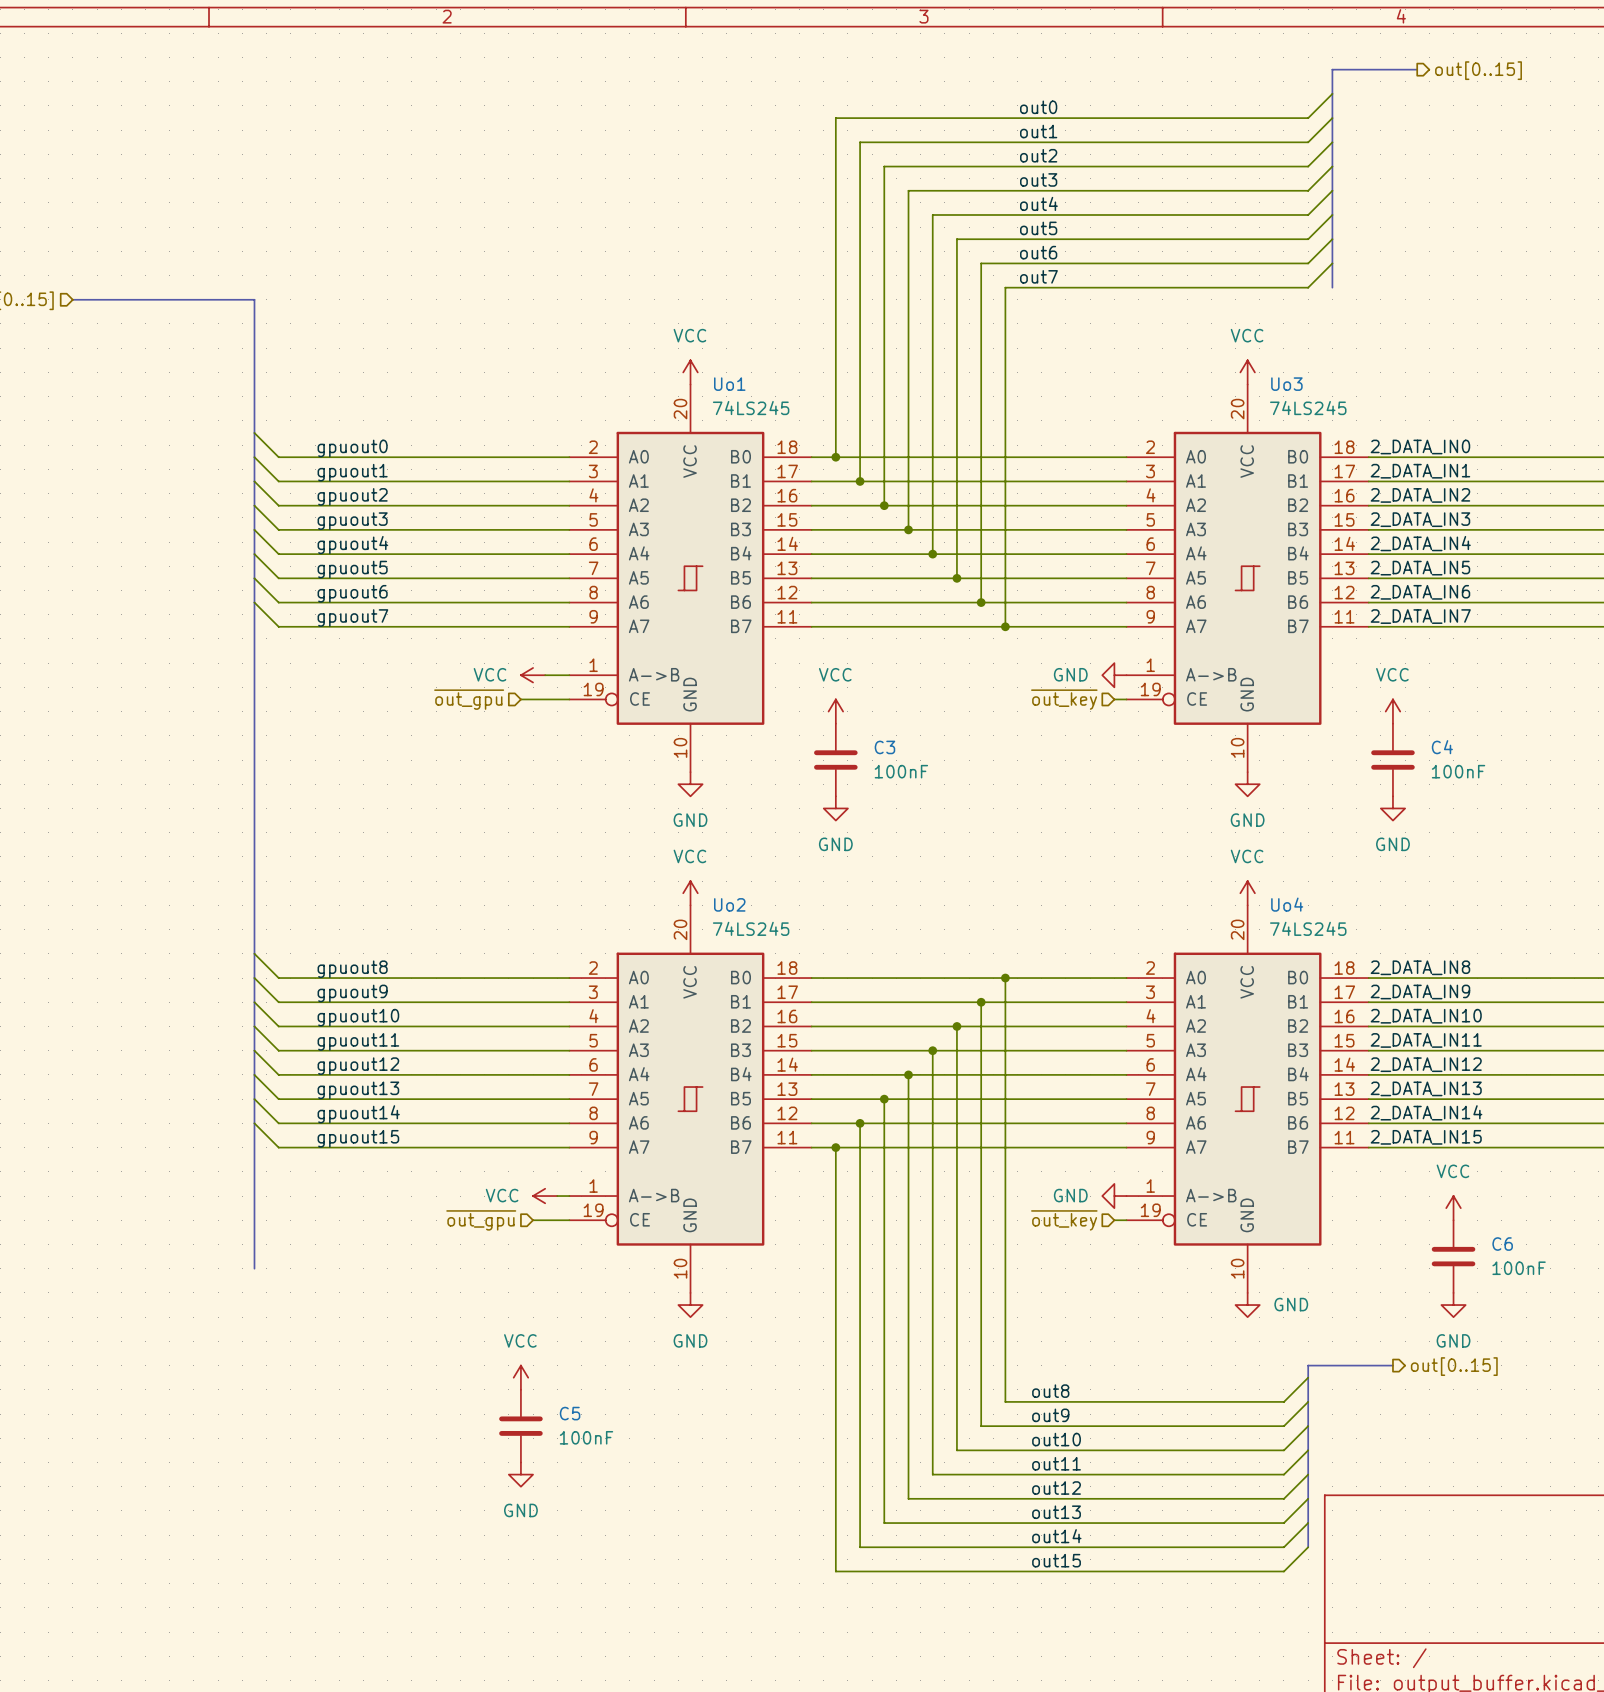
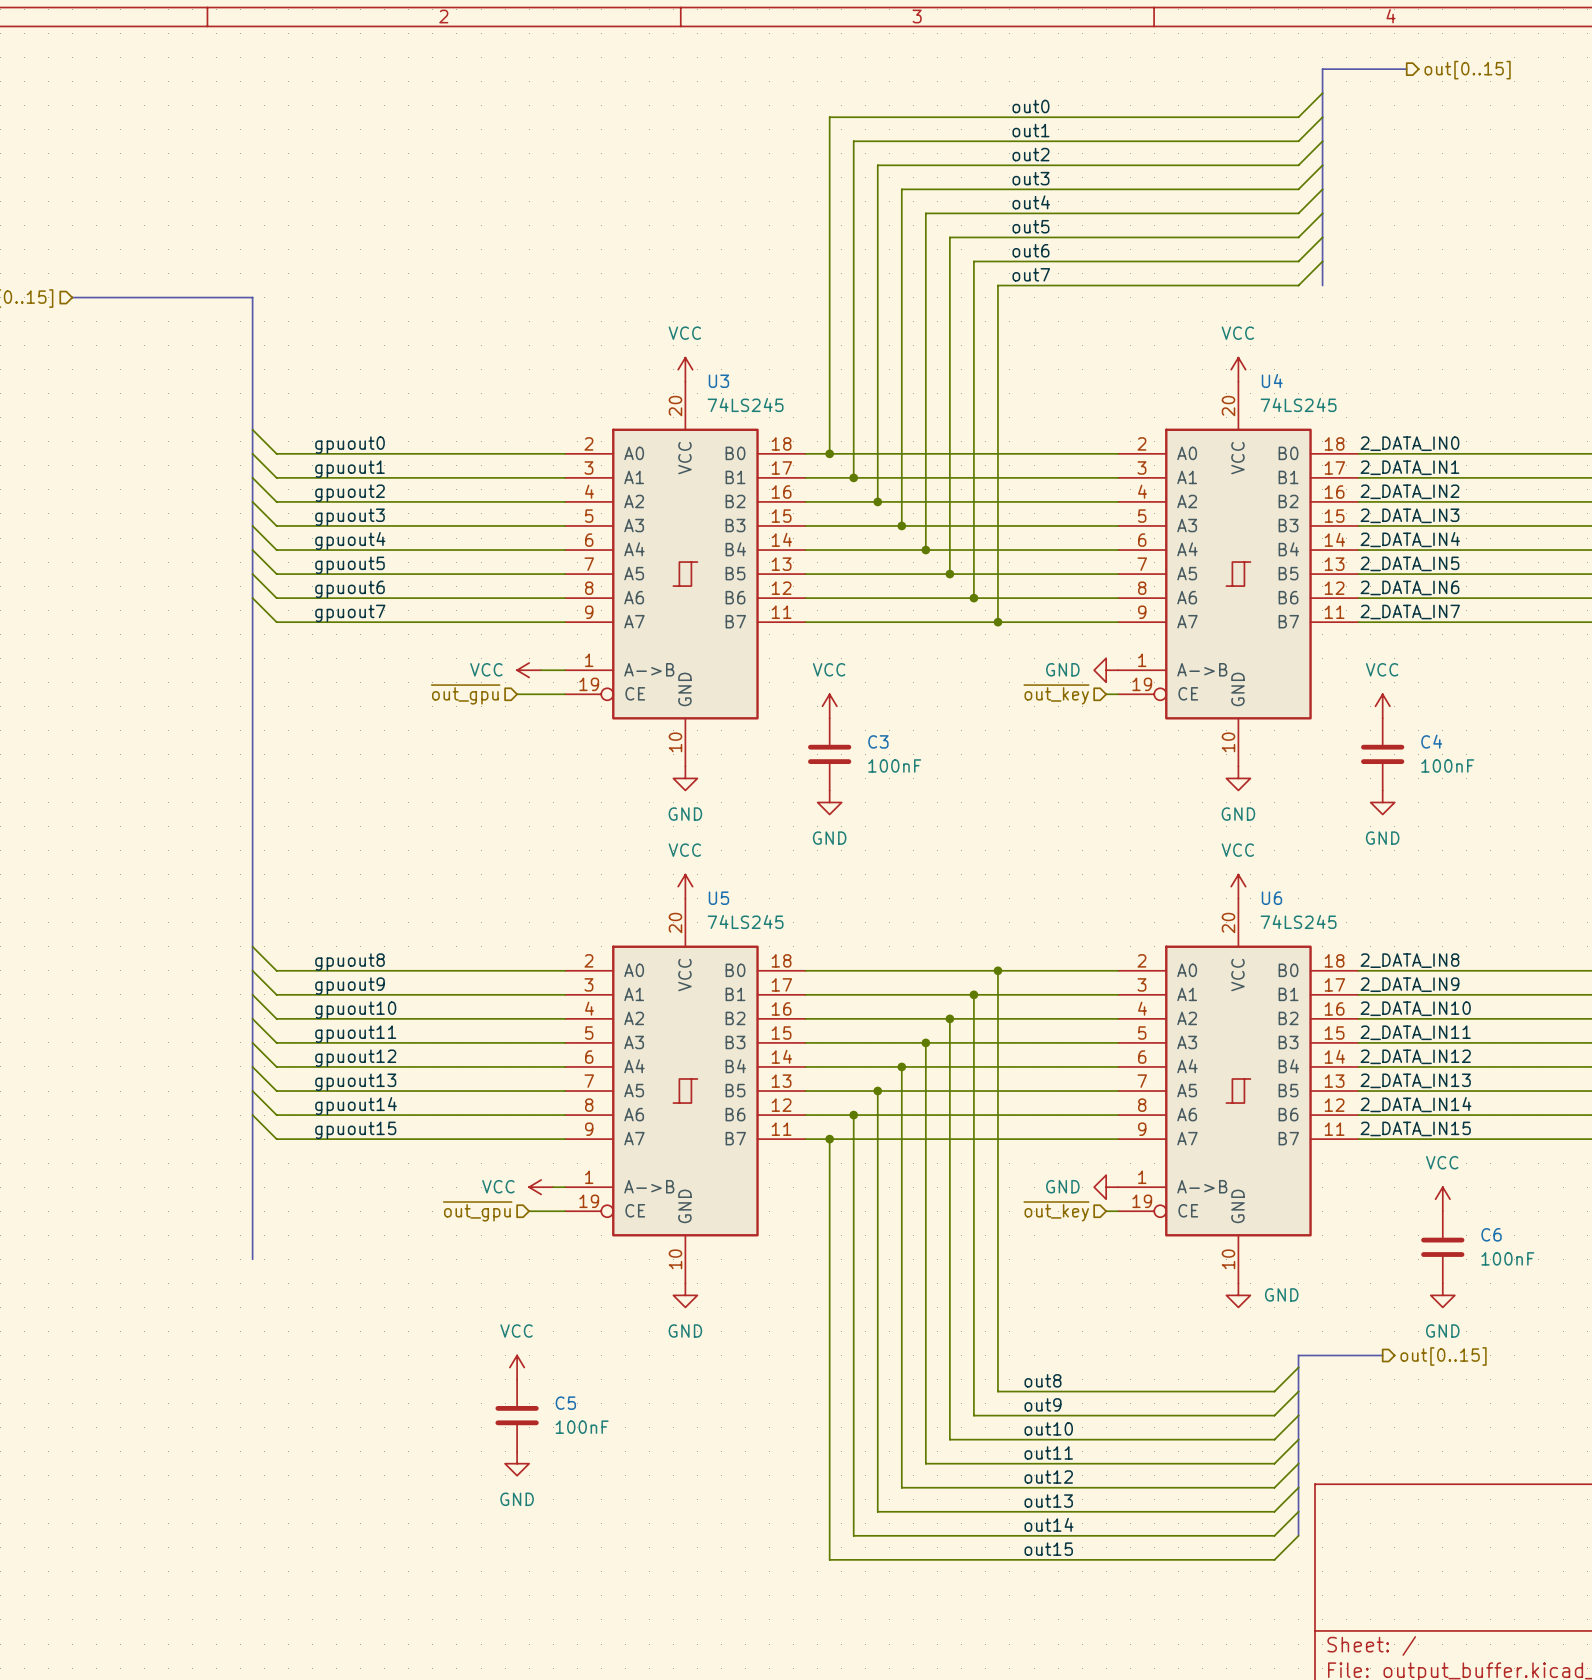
Uo1 name: Uo1 (729, 384) -> U3 (718, 381)
Uo3 name: Uo3 (1286, 384) -> U4 (1272, 380)
Uo2 name: Uo2 (729, 904) -> U5 (718, 898)
Uo4 name: Uo4 (1287, 904) -> U6 (1271, 898)

